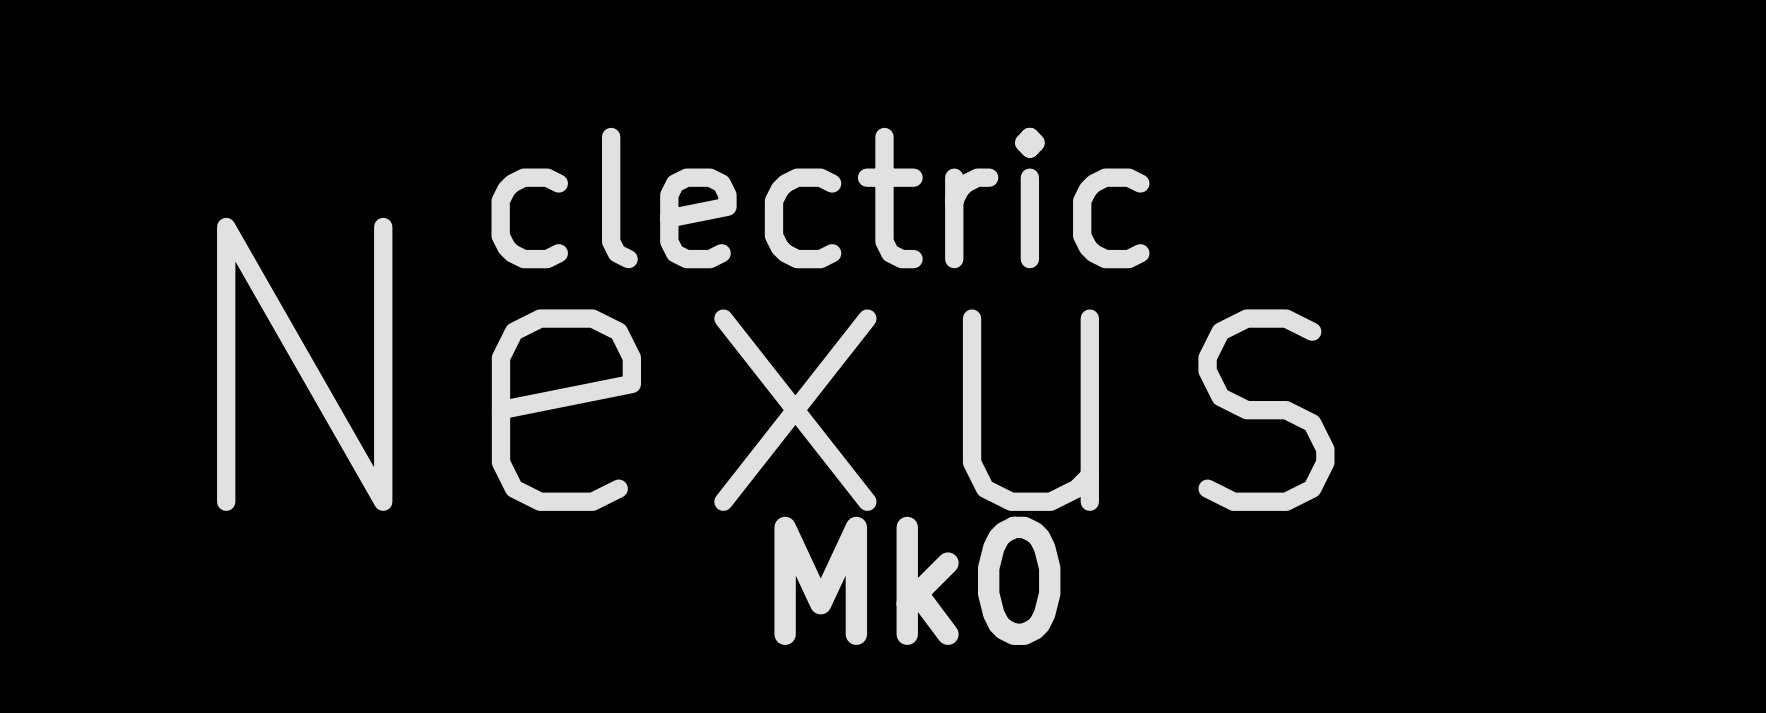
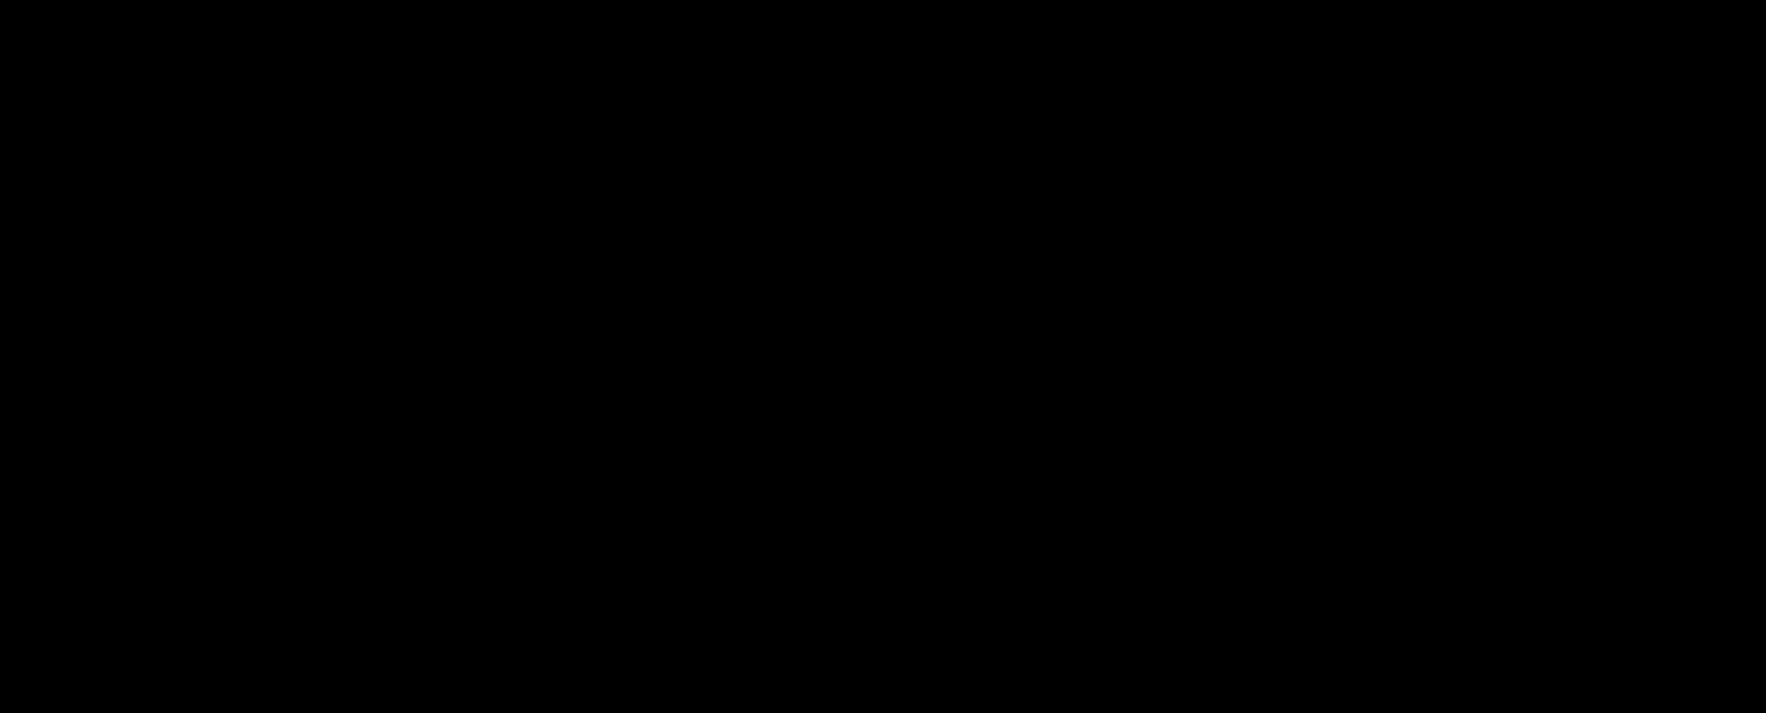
text: clectric (820, 198) -> none
text: Nexus (775, 364) -> none
text: Mk0 (917, 580) -> none

